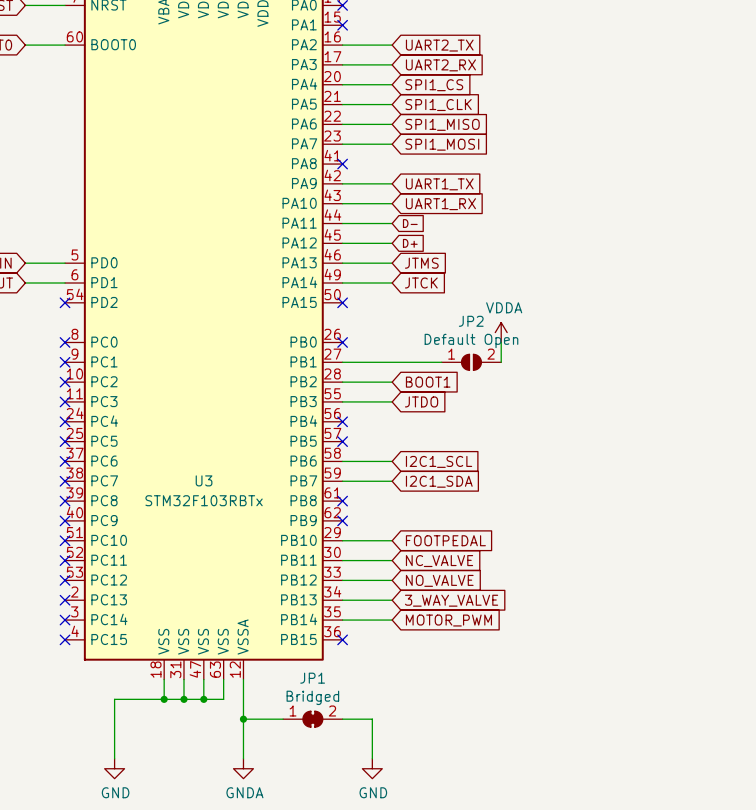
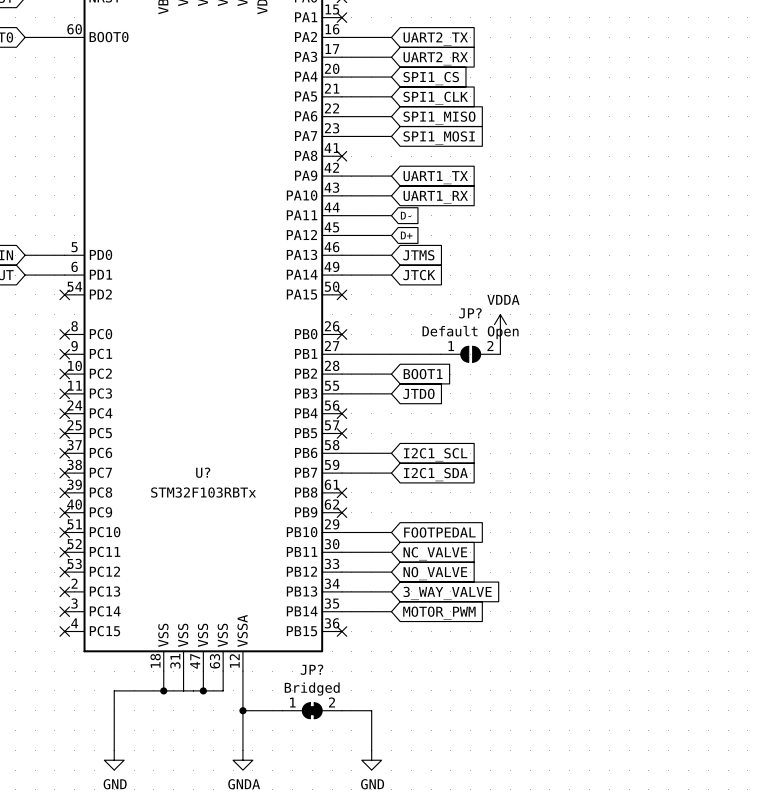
JP2 name: JP2 (471, 321) -> JP? (470, 313)
U3 name: U3 (204, 480) -> U? (203, 472)
JP1 name: JP1 (312, 678) -> JP? (311, 669)
junction: (183, 699) -> none

